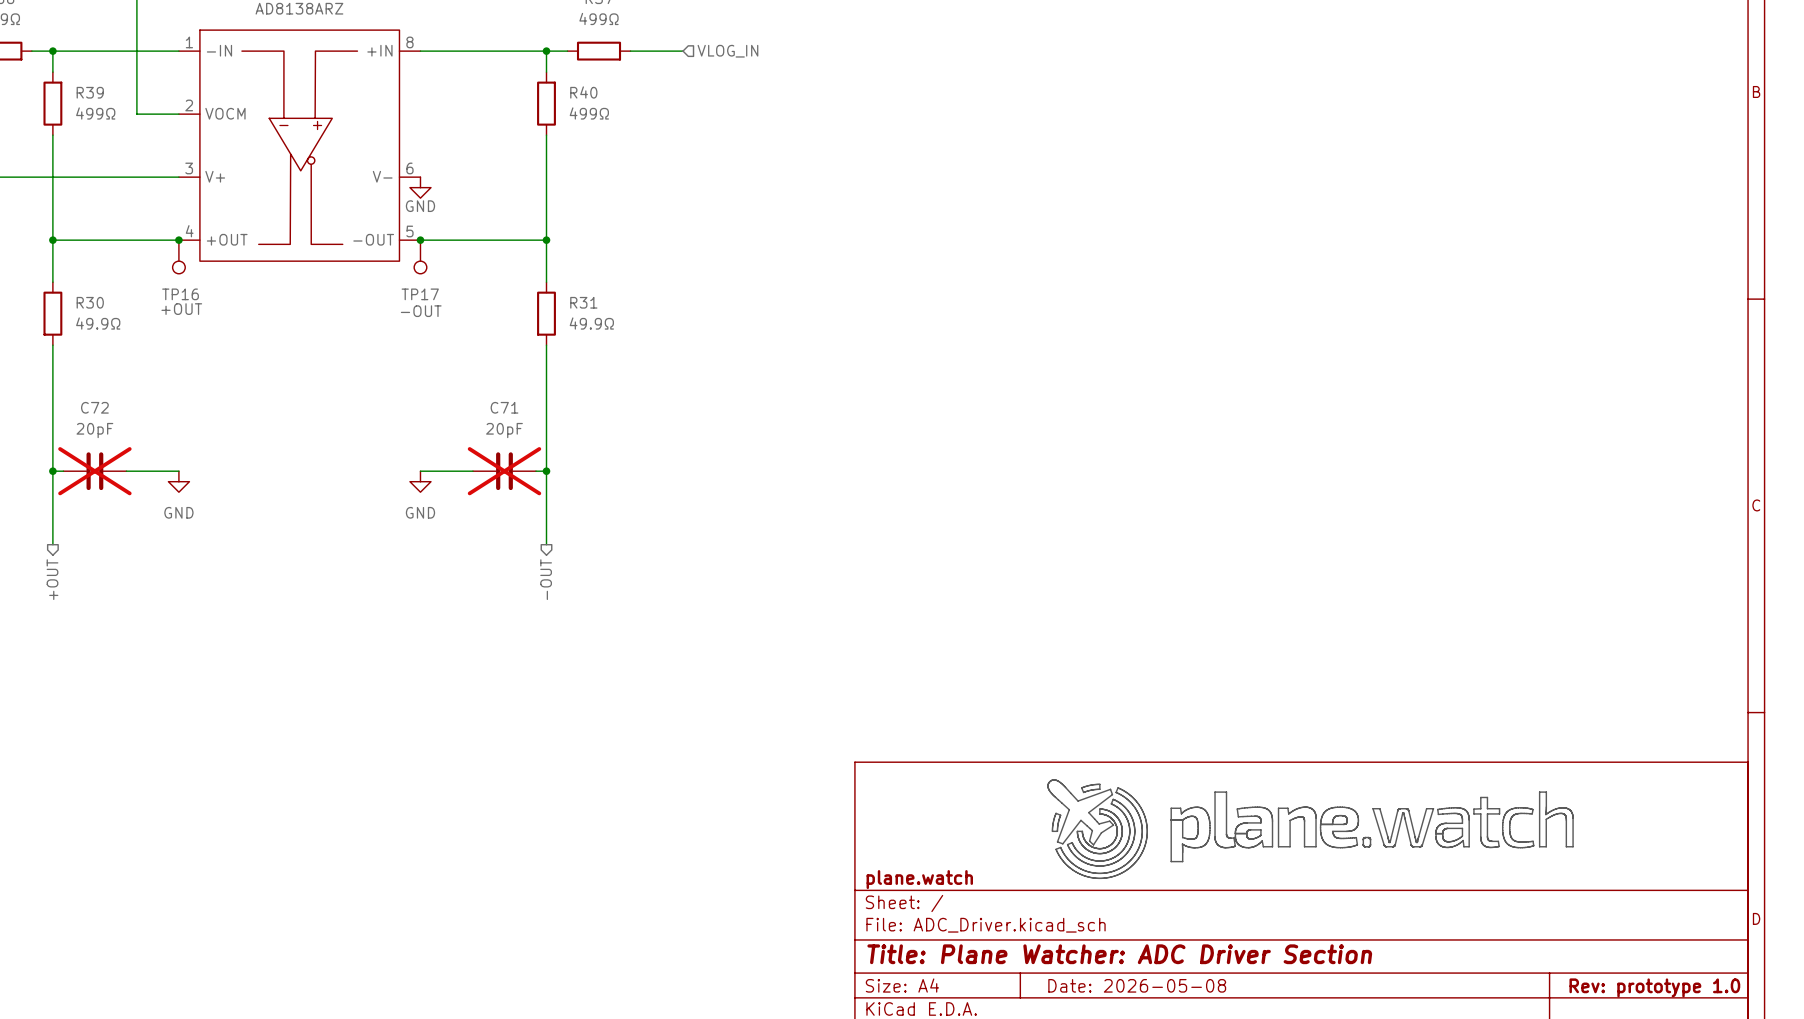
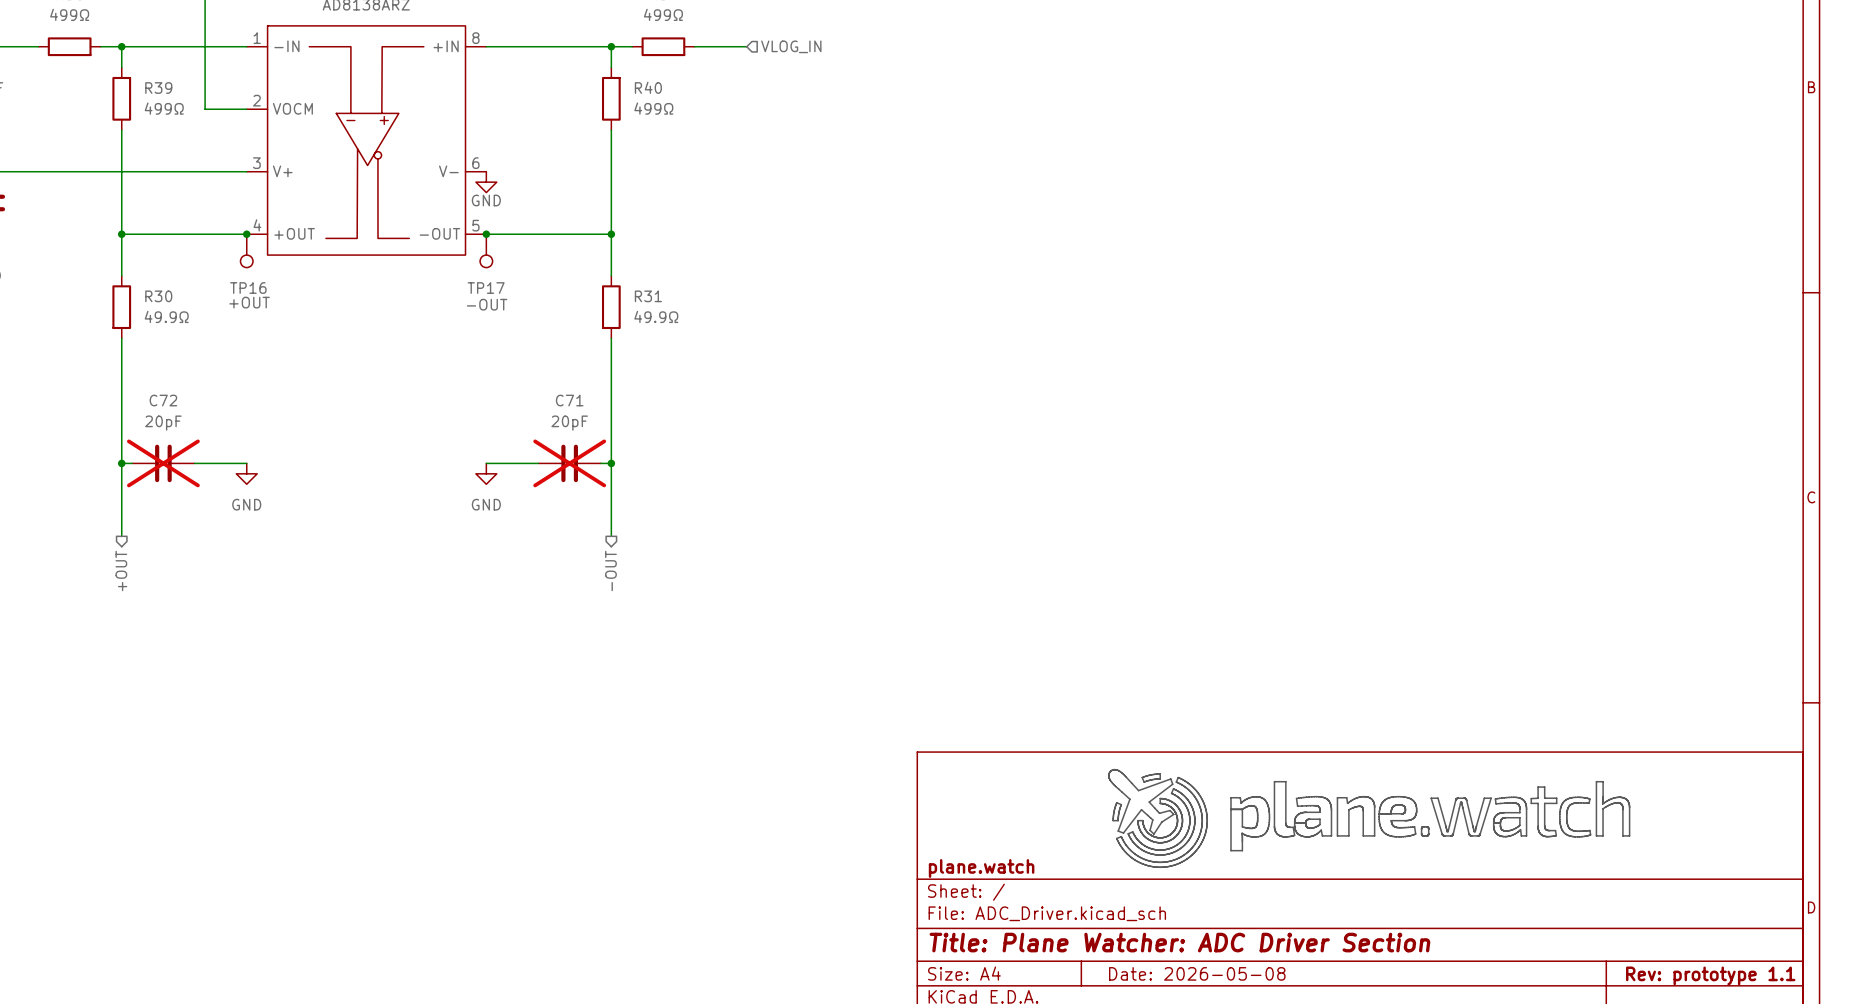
title block: Rev: prototype 1.0 (1654, 987) -> Rev: prototype 1.1 (1710, 975)

